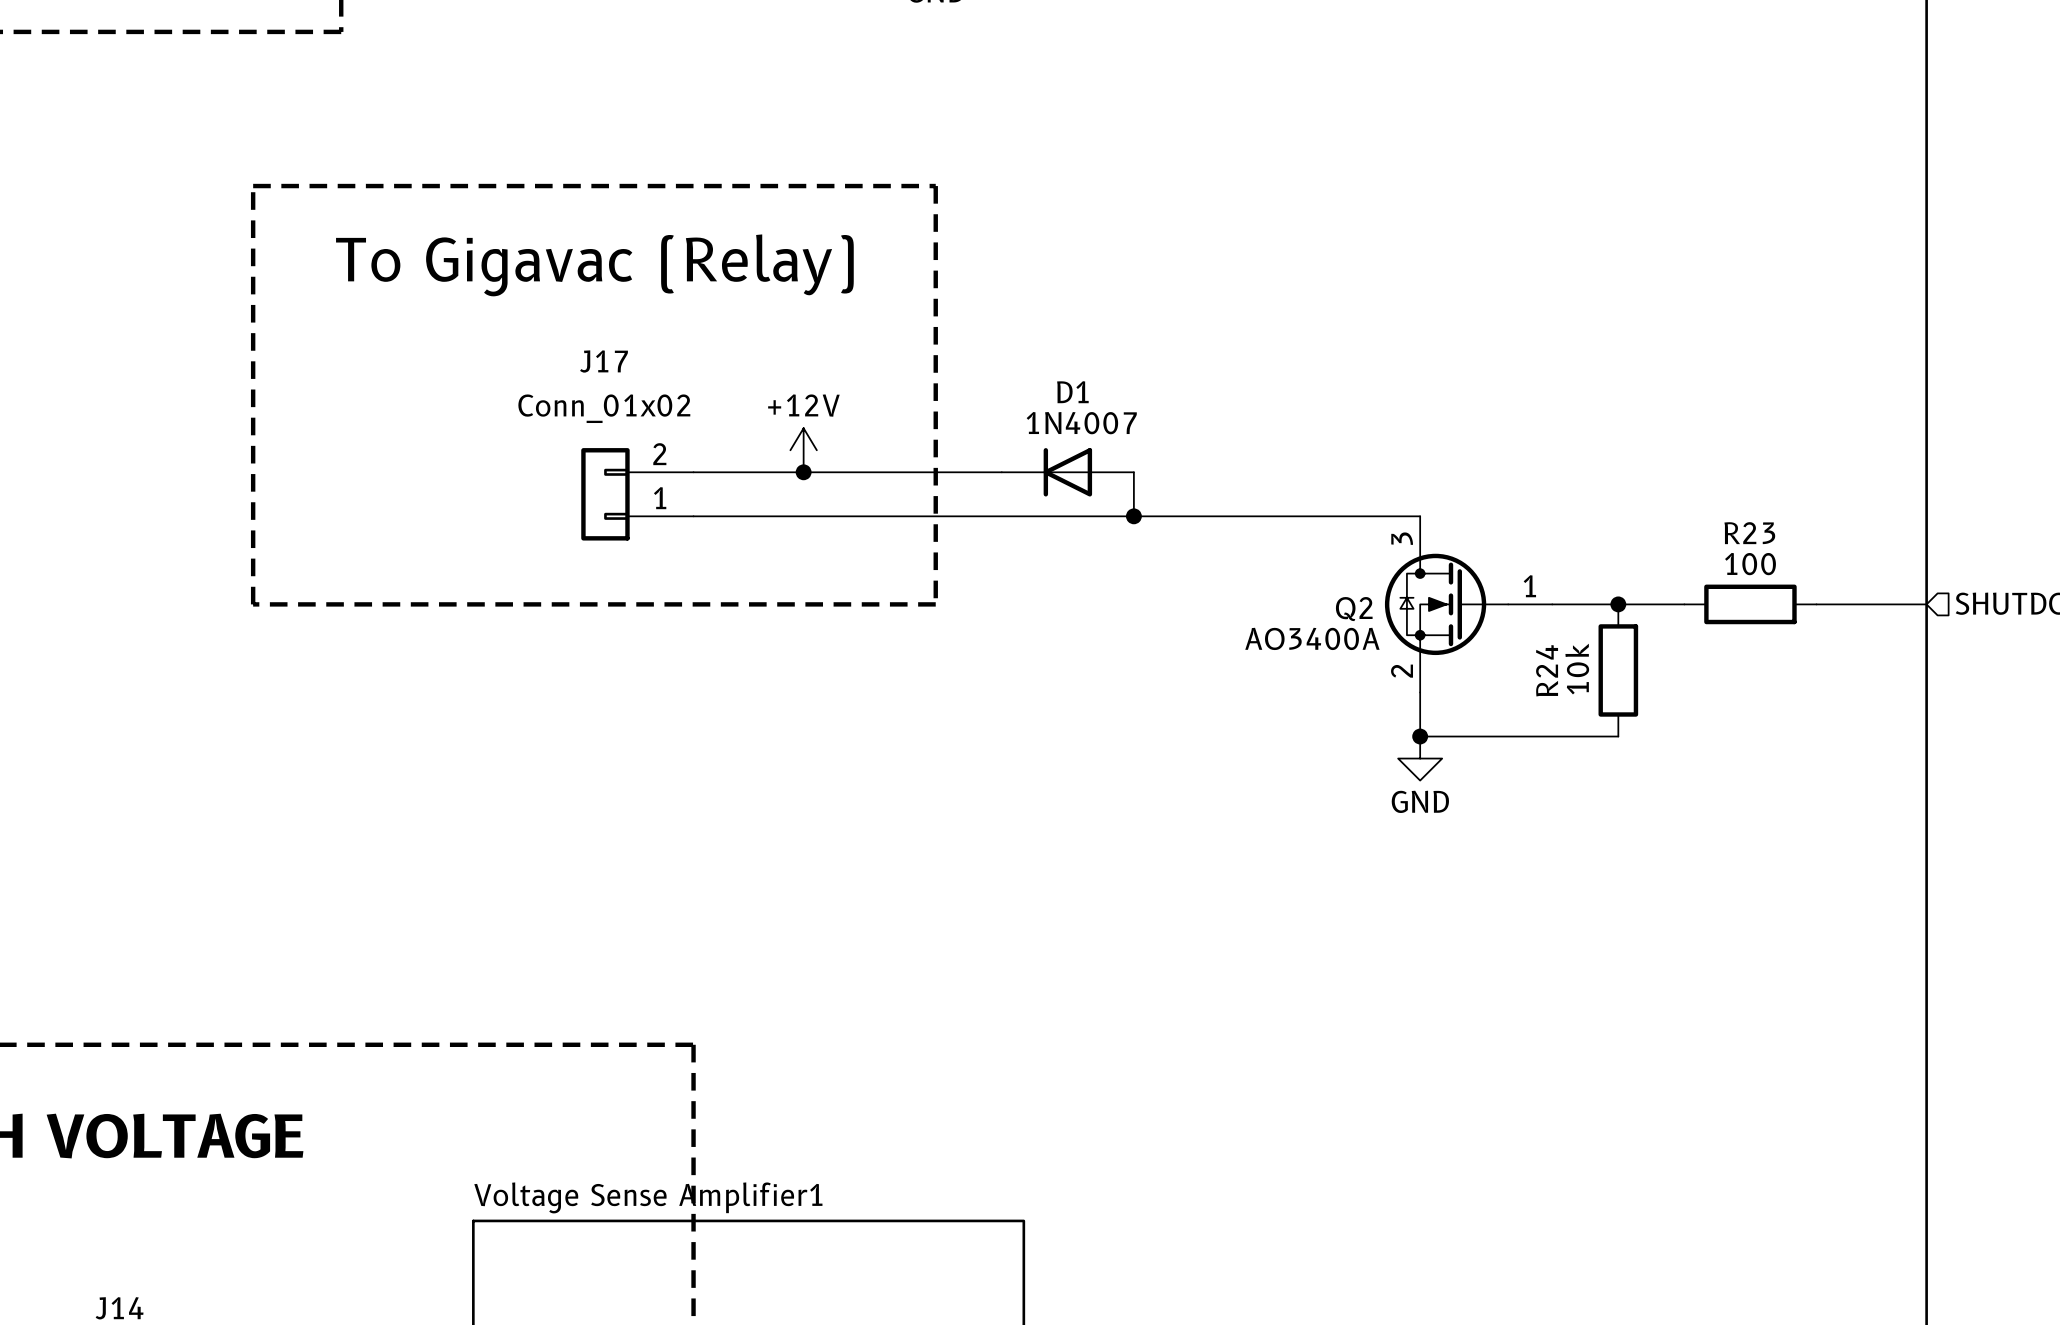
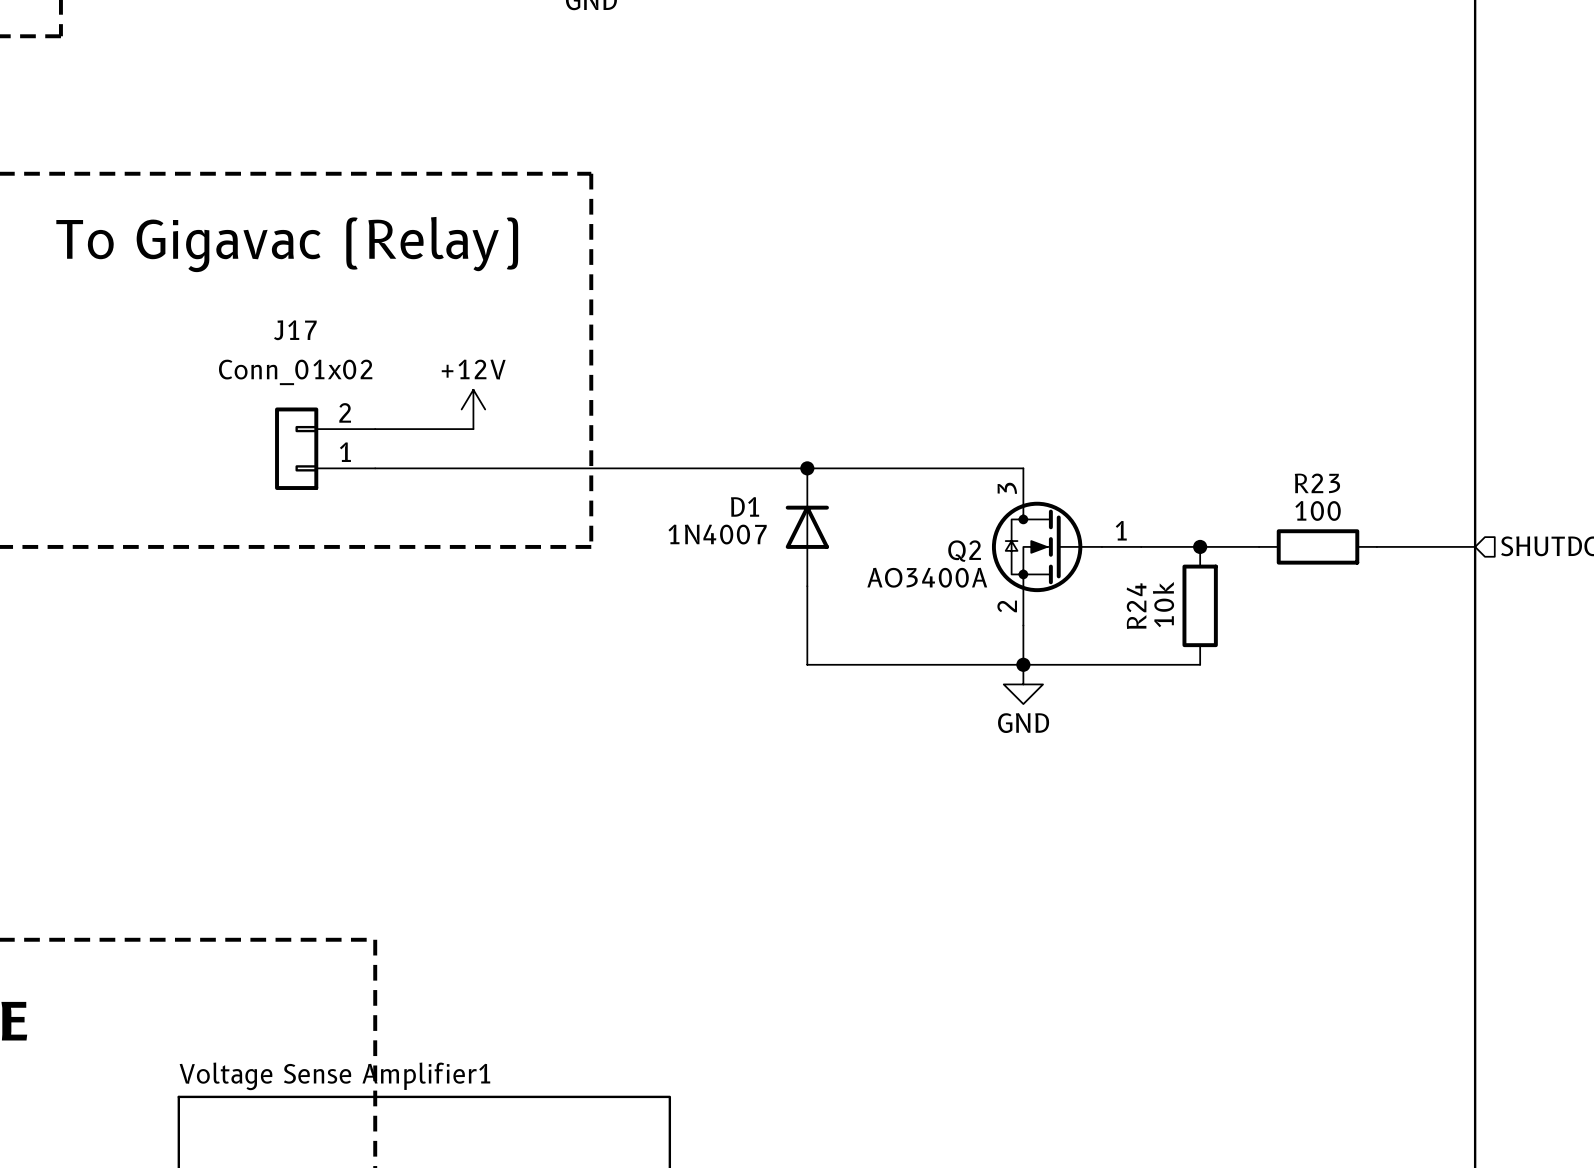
D1 name position: D1 (1072, 392) -> D1 (745, 506)
D1 value position: 1N4007 (1081, 423) -> 1N4007 (717, 534)
wire: (803, 472) (1001, 472) -> none
junction: (803, 472) -> none
D1 rotation: 0° (1067, 472) -> 90° clockwise (807, 527)
D1 position: (1067, 472) -> (807, 527)
wire: (1133, 472) (1133, 516) -> none
junction position: (1133, 516) -> (807, 468)
wire: none -> (807, 586) (807, 664) (1023, 664)

